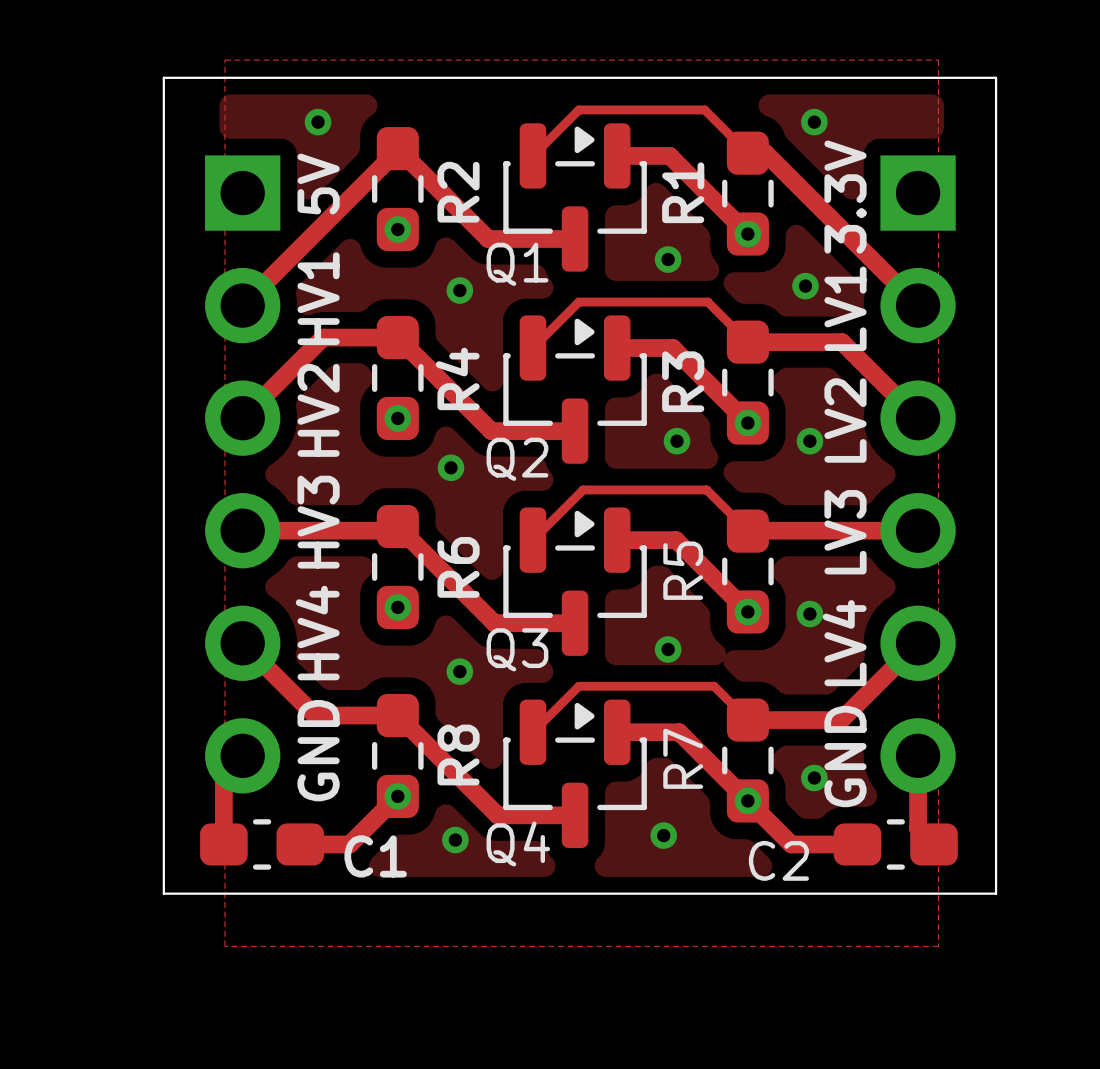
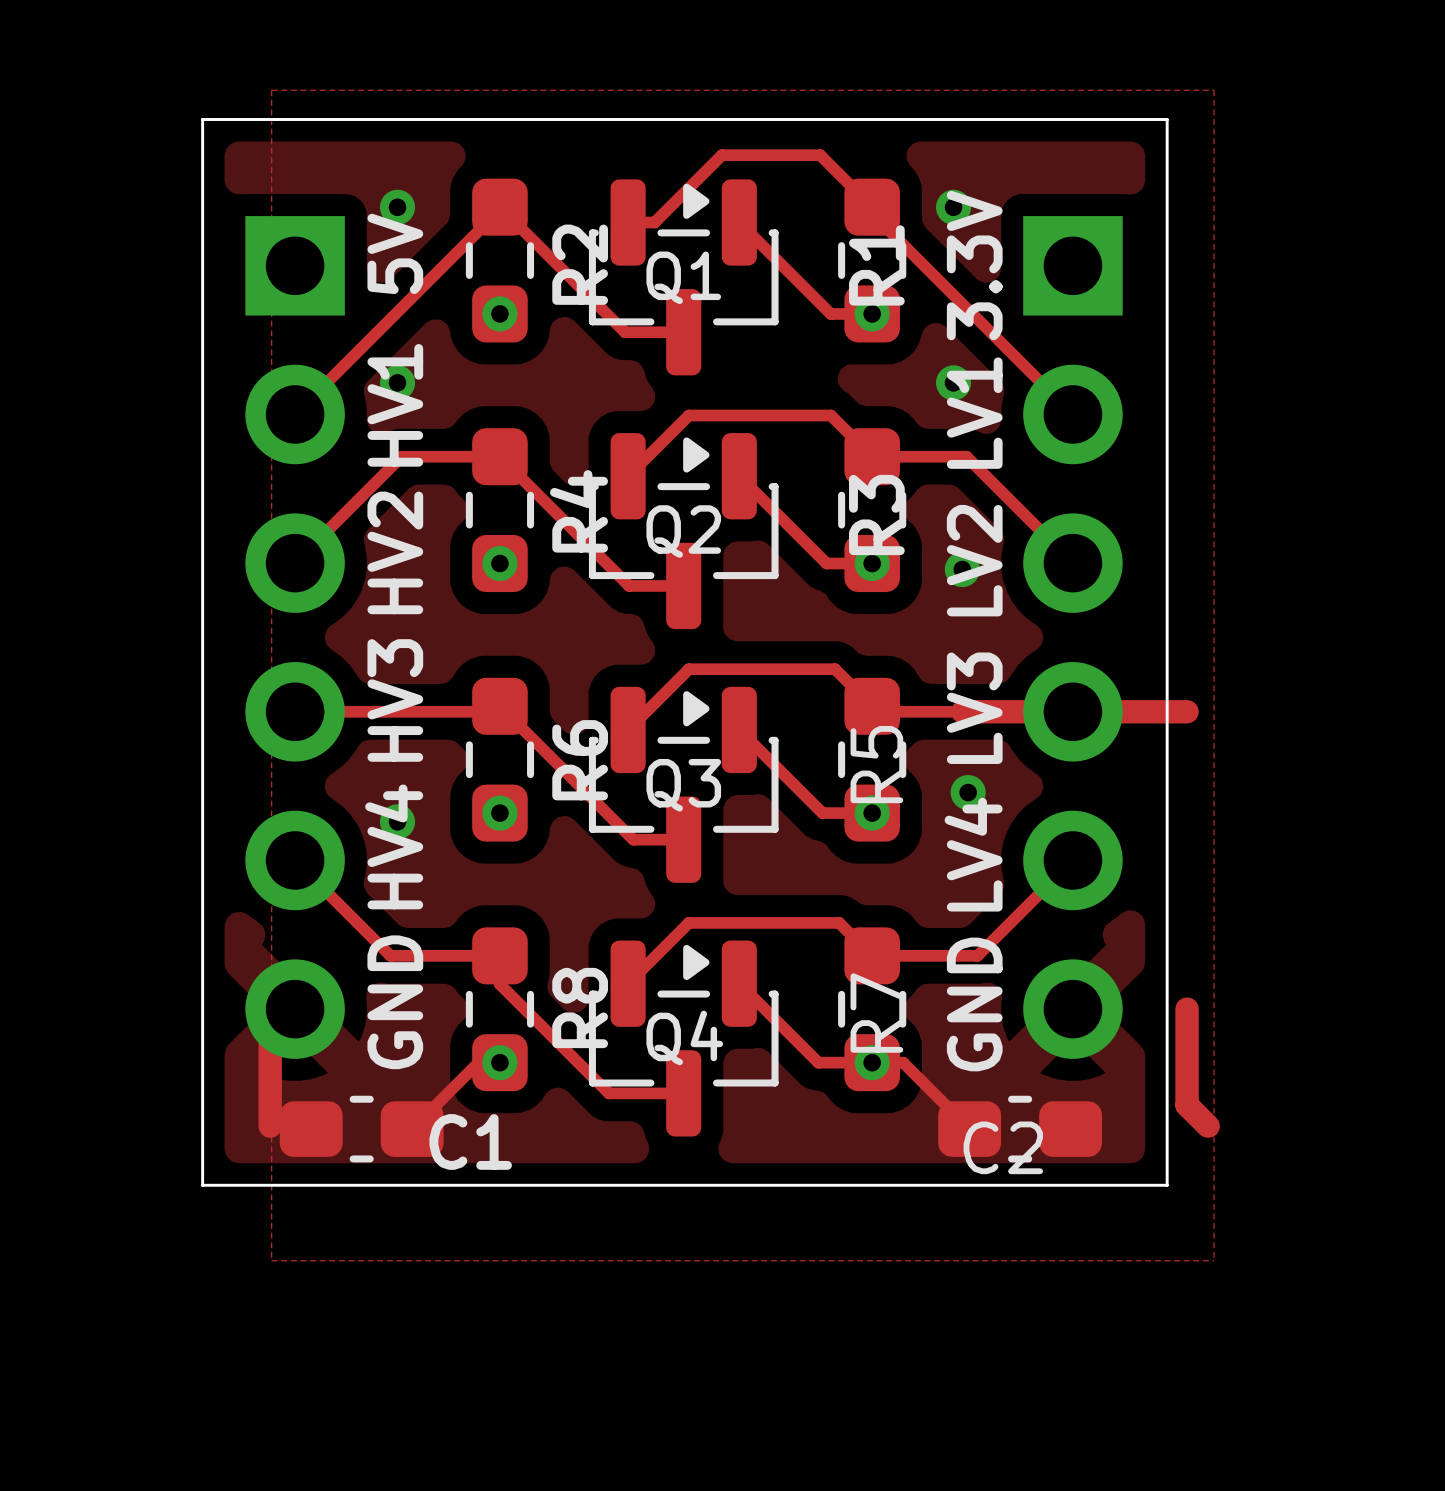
board edge: (163, 77) (996, 77) (996, 893) (163, 893) (163, 77) -> (202, 119) (202, 1185) (1167, 1185) (1167, 119) (202, 119)
via position: (318, 122) -> (397, 207)
via: (814, 122) -> none
via: none -> (953, 207)
track: (532, 155) (578, 109) (704, 109) (747, 153) (765, 153) (918, 305) -> none
track: (617, 155) (669, 155) (747, 234) -> none
track: none -> (628, 222) (654, 222) (721, 155) (820, 155) (872, 207) (872, 213) (1072, 414)
track: none -> (739, 222) (830, 313) (872, 313)
R1 position: (747, 193) -> (872, 260)
Q1 position: (575, 197) -> (683, 277)
text position: 3.3V (845, 197) -> 3.3V (974, 265)
via: (747, 234) -> none
track: (488, 239) (575, 239) -> (619, 326) (625, 332) (683, 332)
track width: thick (488, 239) (397, 148) (242, 305) -> thin (619, 326) (499, 207) (499, 209) (295, 414)
via position: (668, 259) -> (872, 313)
Q1 name position: Q1 (517, 264) -> Q1 (683, 277)
via: none -> (397, 382)
via: none -> (953, 382)
via: (805, 286) -> none
via: (459, 290) -> none
text position: LV1 (845, 308) -> LV1 (974, 413)
track: (532, 348) (578, 302) (707, 302) (747, 342) (842, 342) (918, 418) -> none
track: (617, 348) (672, 348) (747, 422) -> none
track: none -> (628, 476) (688, 415) (830, 415) (872, 456) (966, 456) (1072, 563)
track: none -> (739, 476) (826, 563) (872, 563)
R3 position: (747, 382) -> (872, 510)
Q2 position: (575, 389) -> (683, 531)
track width: thick (242, 418) (323, 337) (397, 337) (491, 431) -> thin (295, 563) (401, 456) (499, 456) (623, 580)
text position: LV2 (845, 420) -> LV2 (974, 560)
track: (491, 431) (575, 431) -> (623, 580) (629, 585) (683, 585)
via position: (676, 441) -> (872, 563)
via: (809, 441) -> none
Q2 name position: Q2 (517, 459) -> Q2 (683, 531)
via: (450, 467) -> none
part position: (918, 474) -> (1072, 637)
track width: thick (242, 530) (393, 530) (397, 526) (494, 623) -> thin (295, 711) (494, 711) (499, 706) (627, 833)
track: (747, 531) (706, 489) (583, 489) (532, 540) -> (962, 711) (877, 711) (835, 669) (688, 669) (628, 729)
text position: LV3 (845, 532) -> LV3 (974, 708)
track: (617, 540) (676, 540) (747, 611) -> none
track: none -> (739, 729) (822, 813) (872, 813)
R5 position: (747, 571) -> (872, 759)
Q3 position: (575, 581) -> (683, 784)
via: none -> (872, 813)
via position: (747, 611) -> (968, 792)
via: none -> (397, 821)
via: (809, 614) -> none
track: (494, 623) (575, 623) -> (627, 833) (633, 839) (683, 839)
track width: thick (242, 643) (314, 715) (397, 715) -> thin (295, 860) (390, 955) (499, 955)
track: none -> (1072, 860) (977, 955) (872, 955) (839, 922) (688, 922) (628, 983)
text position: LV4 (844, 643) -> LV4 (973, 854)
track: (918, 643) (841, 720) (747, 720) (714, 686) (578, 686) (532, 732) -> none
Q3 name position: Q3 (517, 649) -> Q3 (683, 785)
via: (668, 649) -> none
via: (459, 671) -> none
track: (397, 715) (497, 815) (575, 815) -> (499, 955) (499, 984) (608, 1093) (683, 1093)
track: (617, 732) (679, 732) (791, 844) (857, 844) -> none
track: none -> (739, 983) (818, 1062) (903, 1062) (969, 1129)
text position: GND (845, 756) -> GND (974, 1004)
R7 position: (747, 760) -> (872, 1009)
Q4 position: (575, 773) -> (683, 1038)
via: (814, 777) -> none
track: none -> (478, 1062) (412, 1129)
track: (397, 796) (349, 844) (300, 844) -> none
via: none -> (872, 1062)
via: (747, 800) -> none
via: (663, 835) -> none
via: (455, 840) -> none
Q4 name position: Q4 (518, 843) -> Q4 (684, 1037)
C1 position: (262, 844) -> (361, 1129)
C2 position: (895, 844) -> (1020, 1129)

